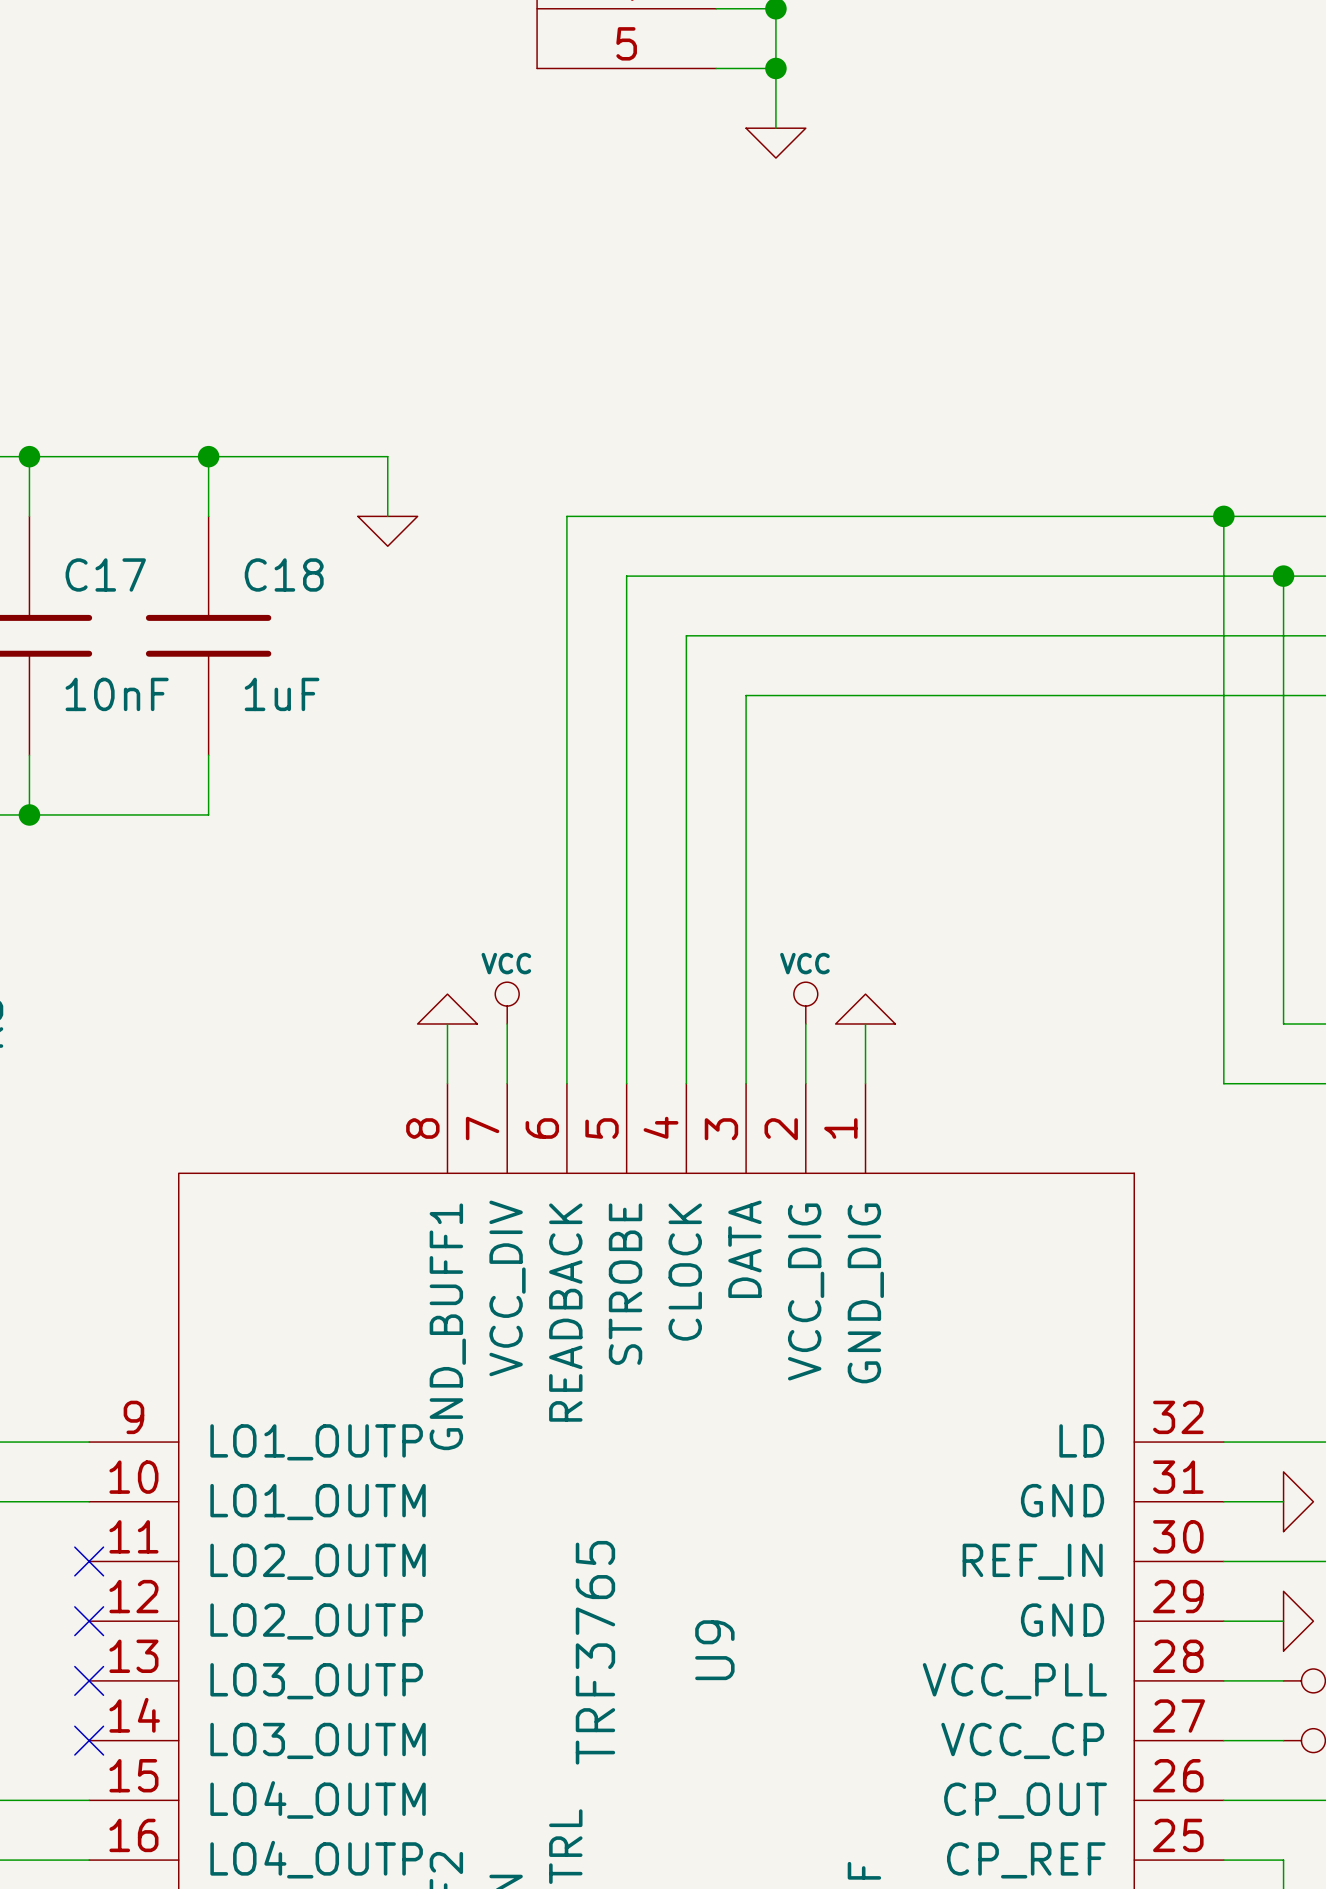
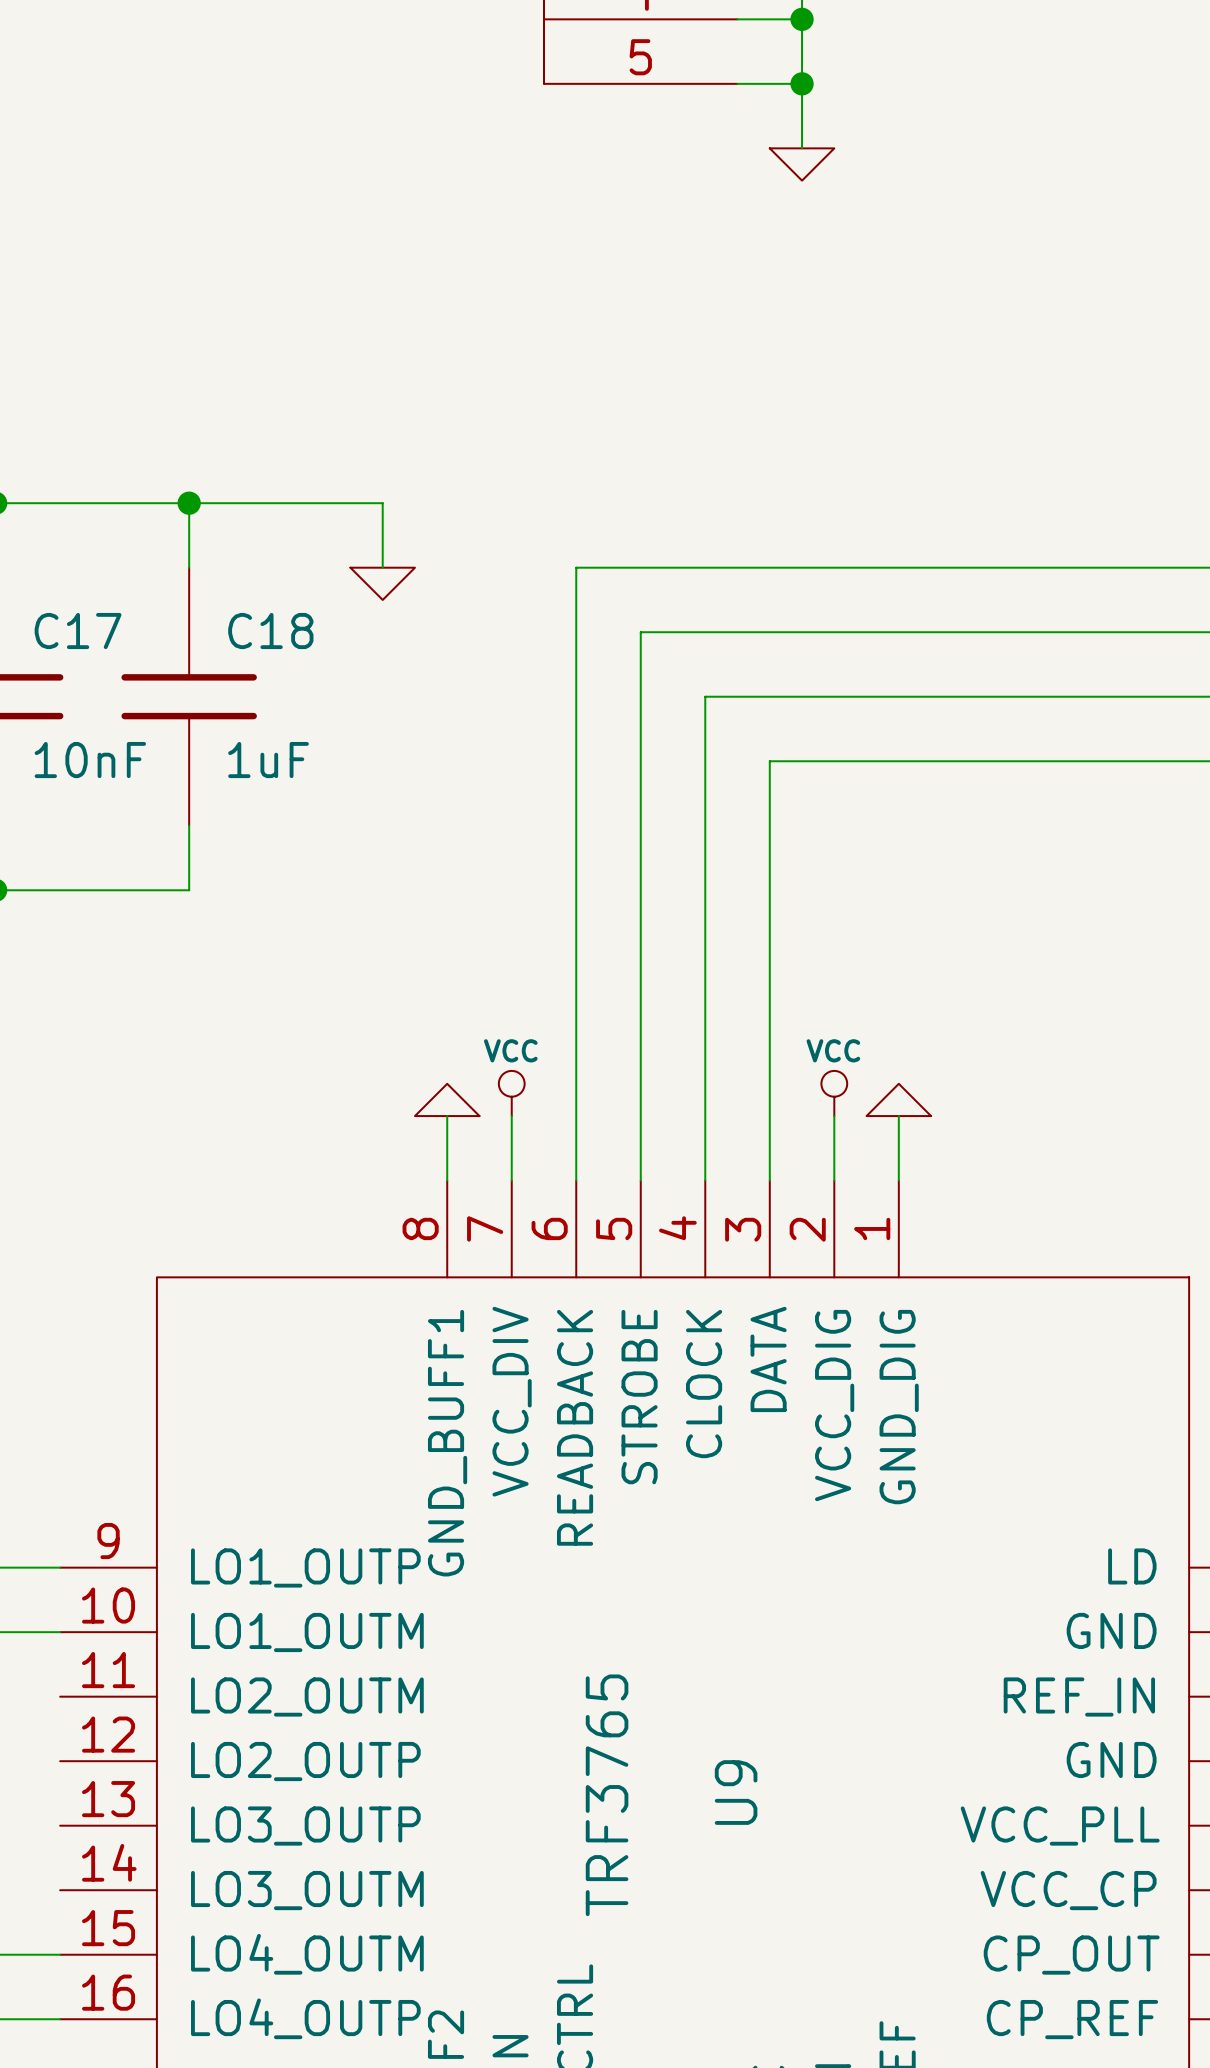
no-connect mark: (89, 1561) -> none
no-connect mark: (89, 1621) -> none
no-connect mark: (89, 1680) -> none
no-connect mark: (89, 1740) -> none

